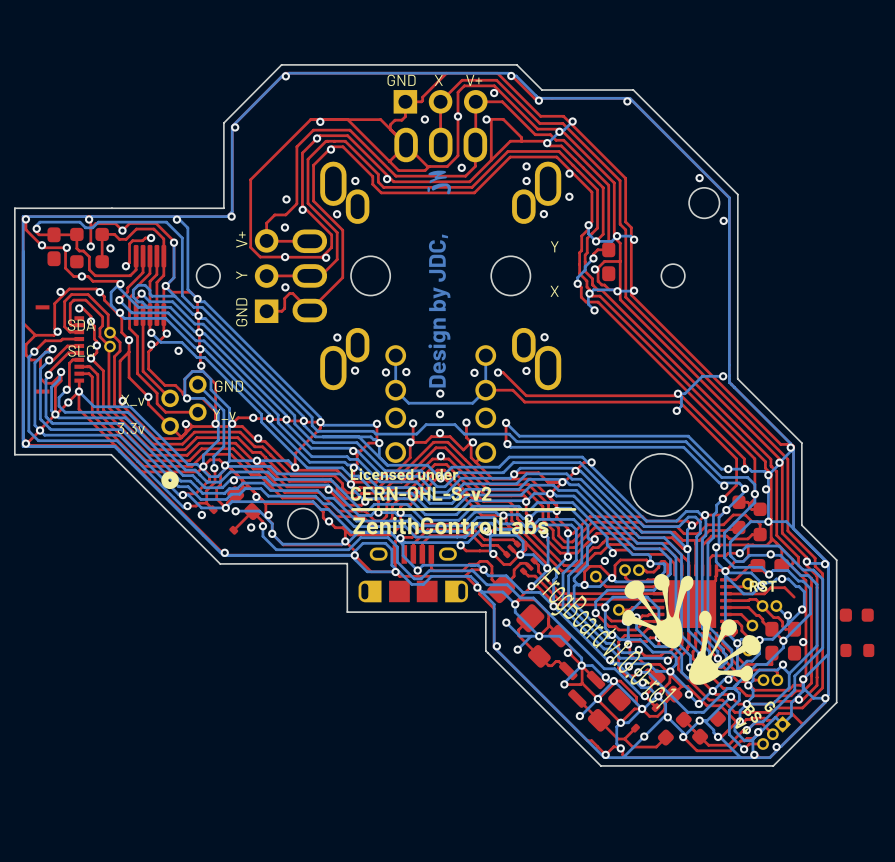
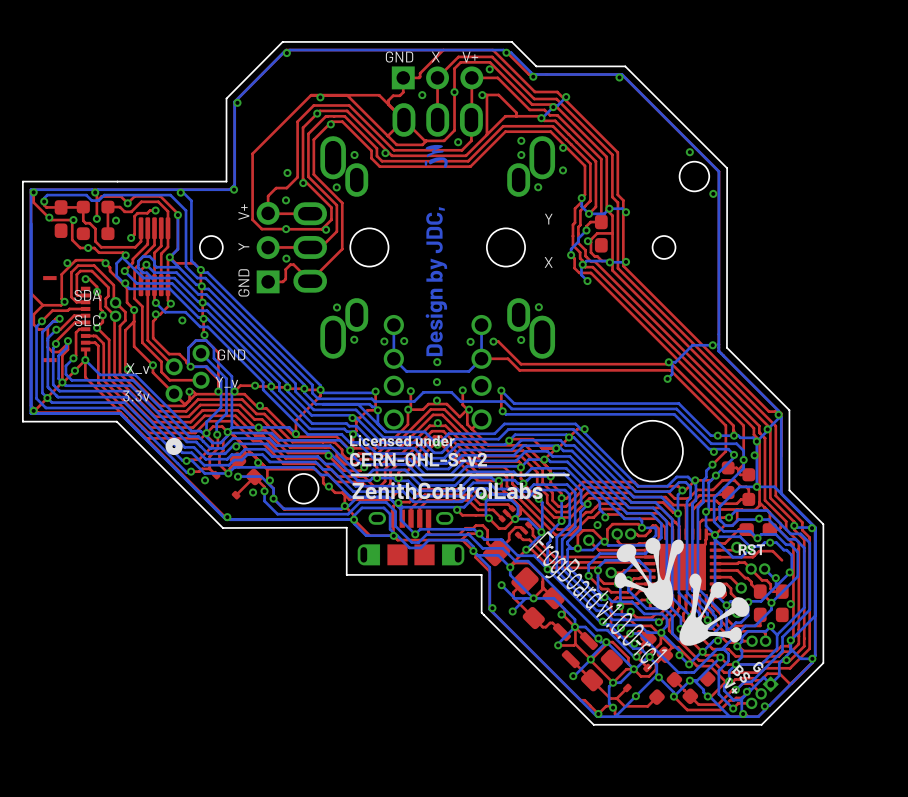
part: (856, 615) -> none
part: (857, 650) -> none

